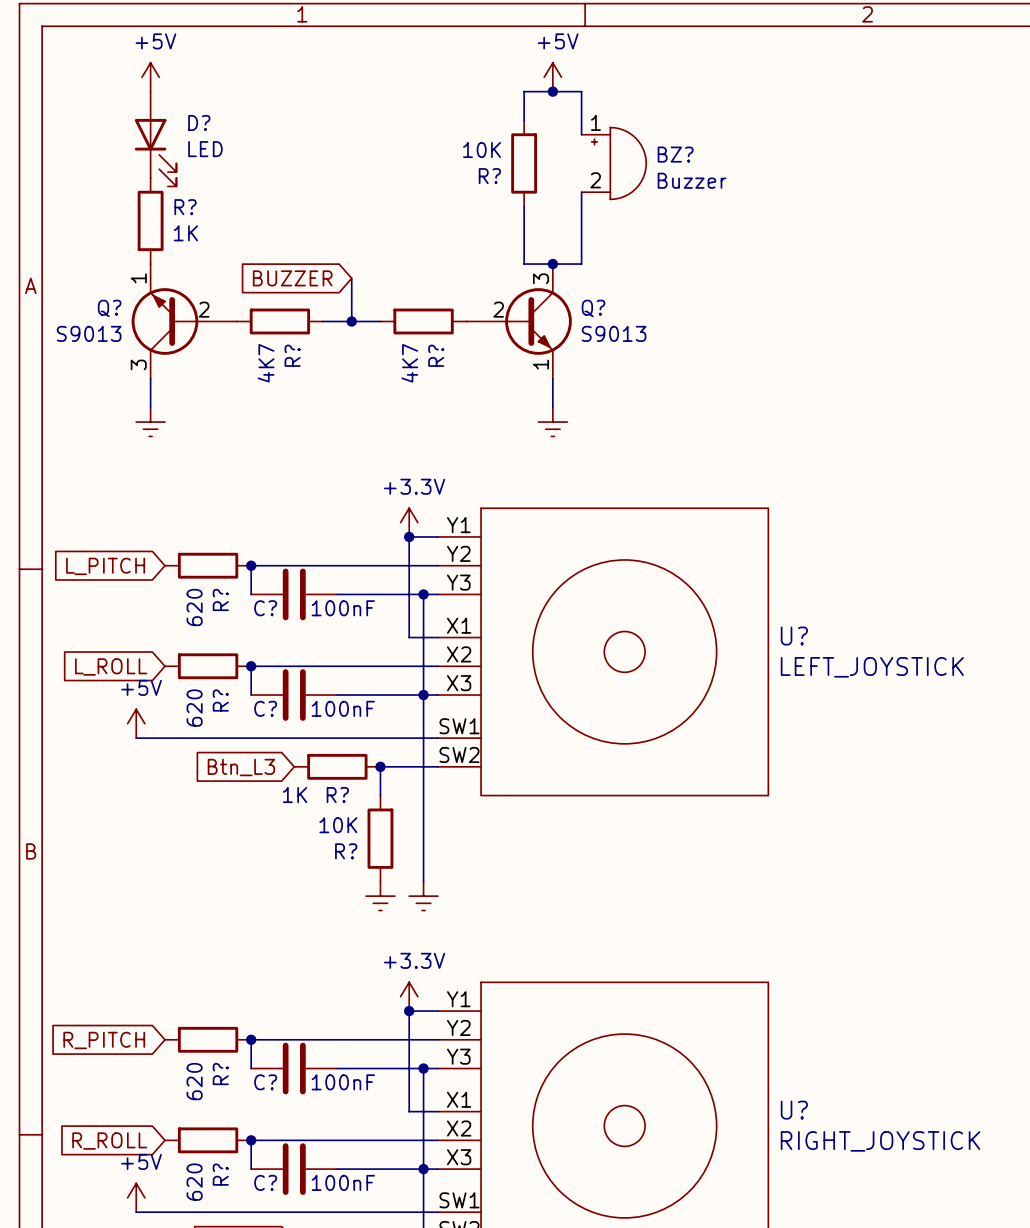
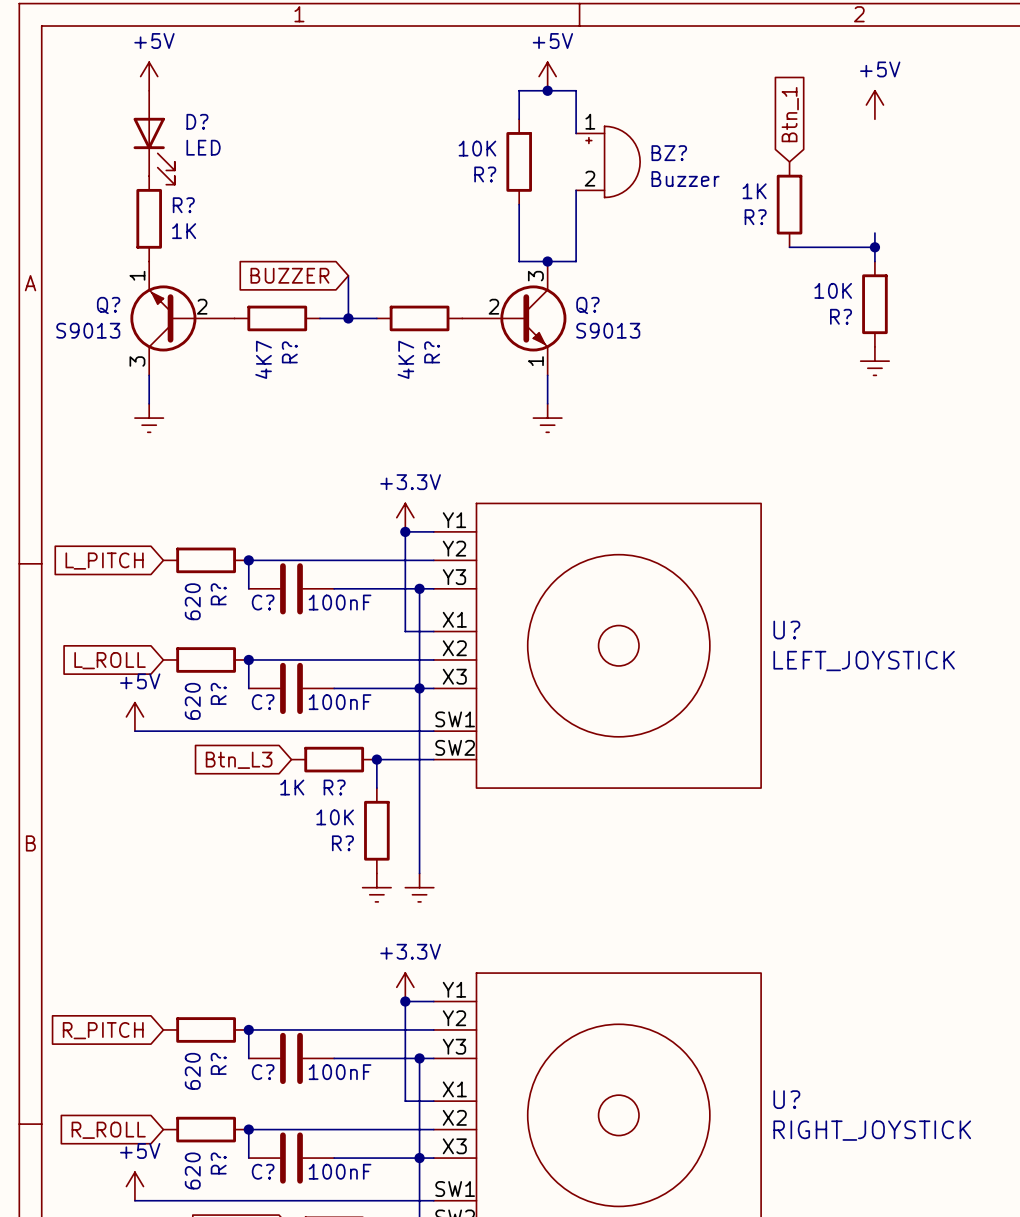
power symbol: none -> +5V (874, 105)
global label: none -> Btn_1 (790, 114)
R?: none -> 1K (789, 204)
wire: none -> (874, 233) (874, 261)
wire: none -> (789, 247) (874, 247)
junction: none -> (874, 247)
R?: none -> 10K (874, 304)
power symbol: none -> (874, 361)

